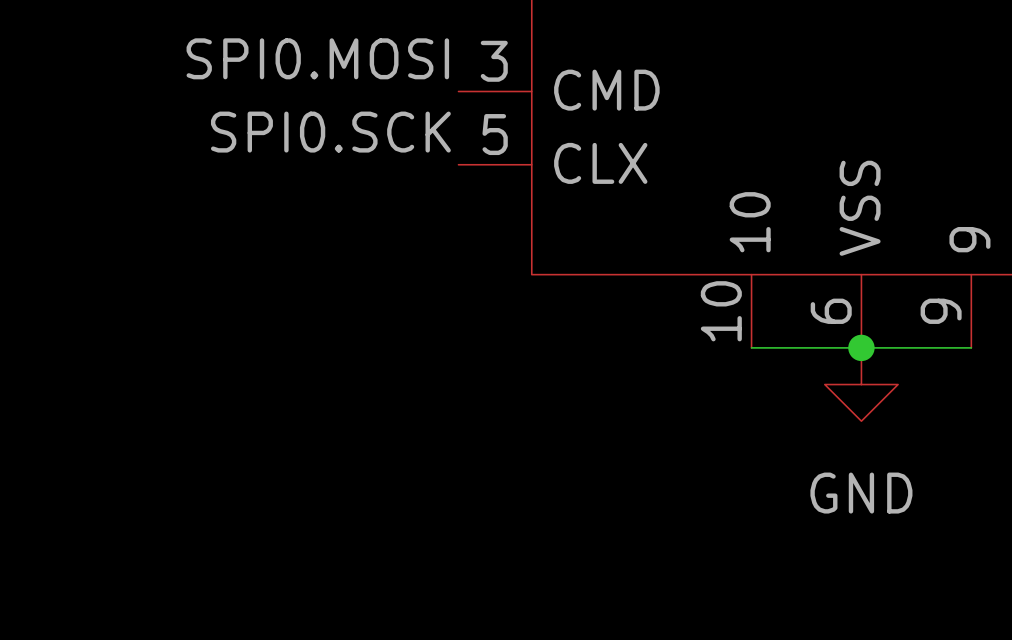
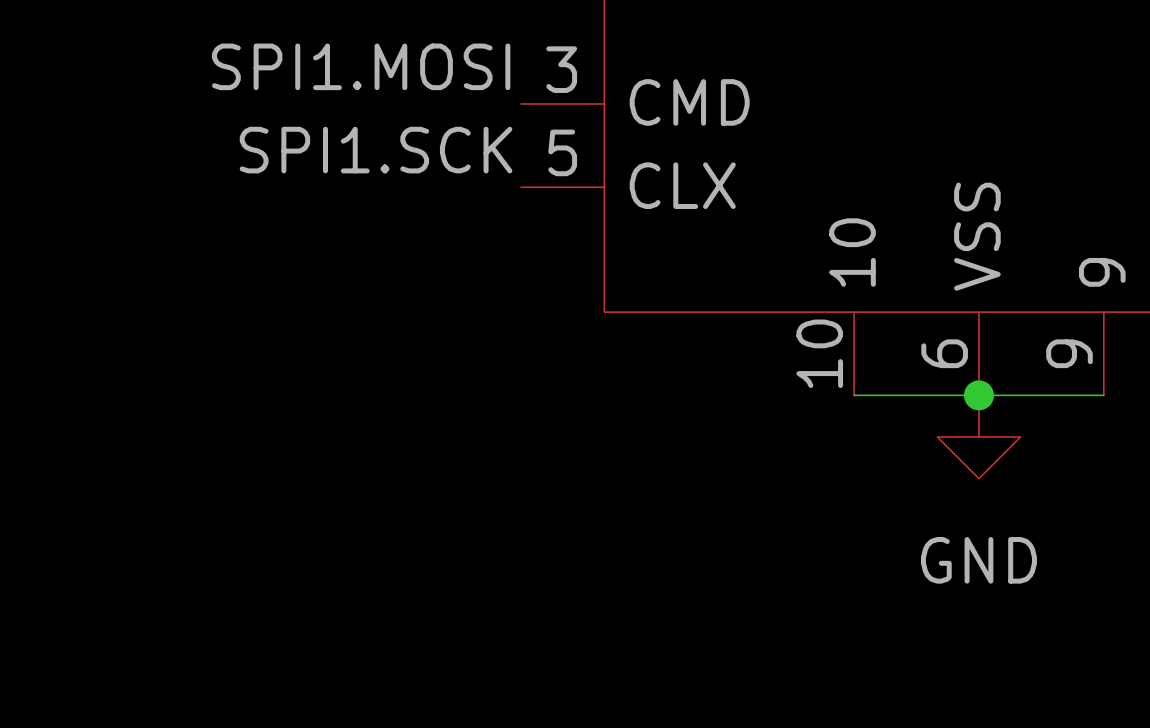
label: SPI0.MOSI (317, 58) -> SPI1.MOSI (361, 66)
label: SPI0.SCK (330, 132) -> SPI1.SCK (376, 150)

